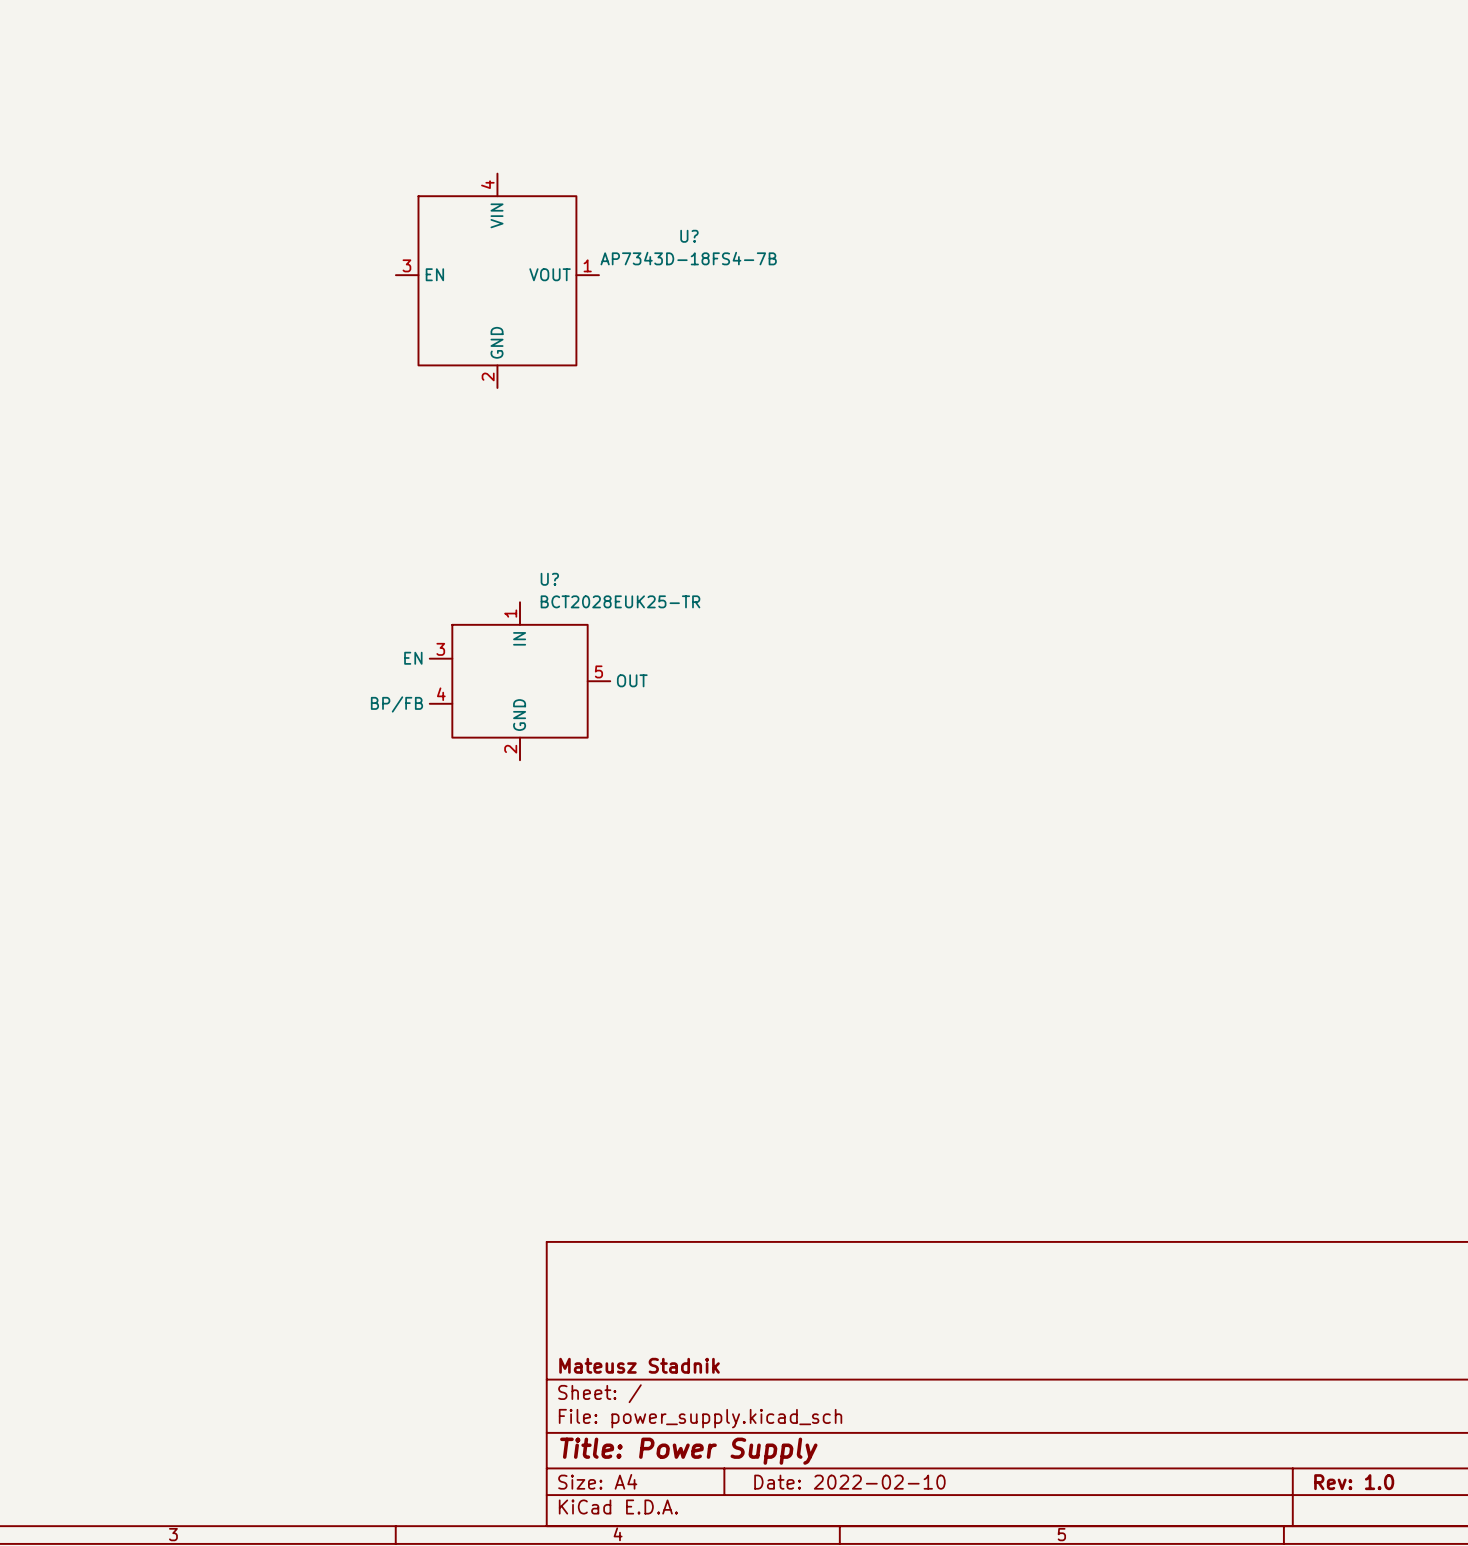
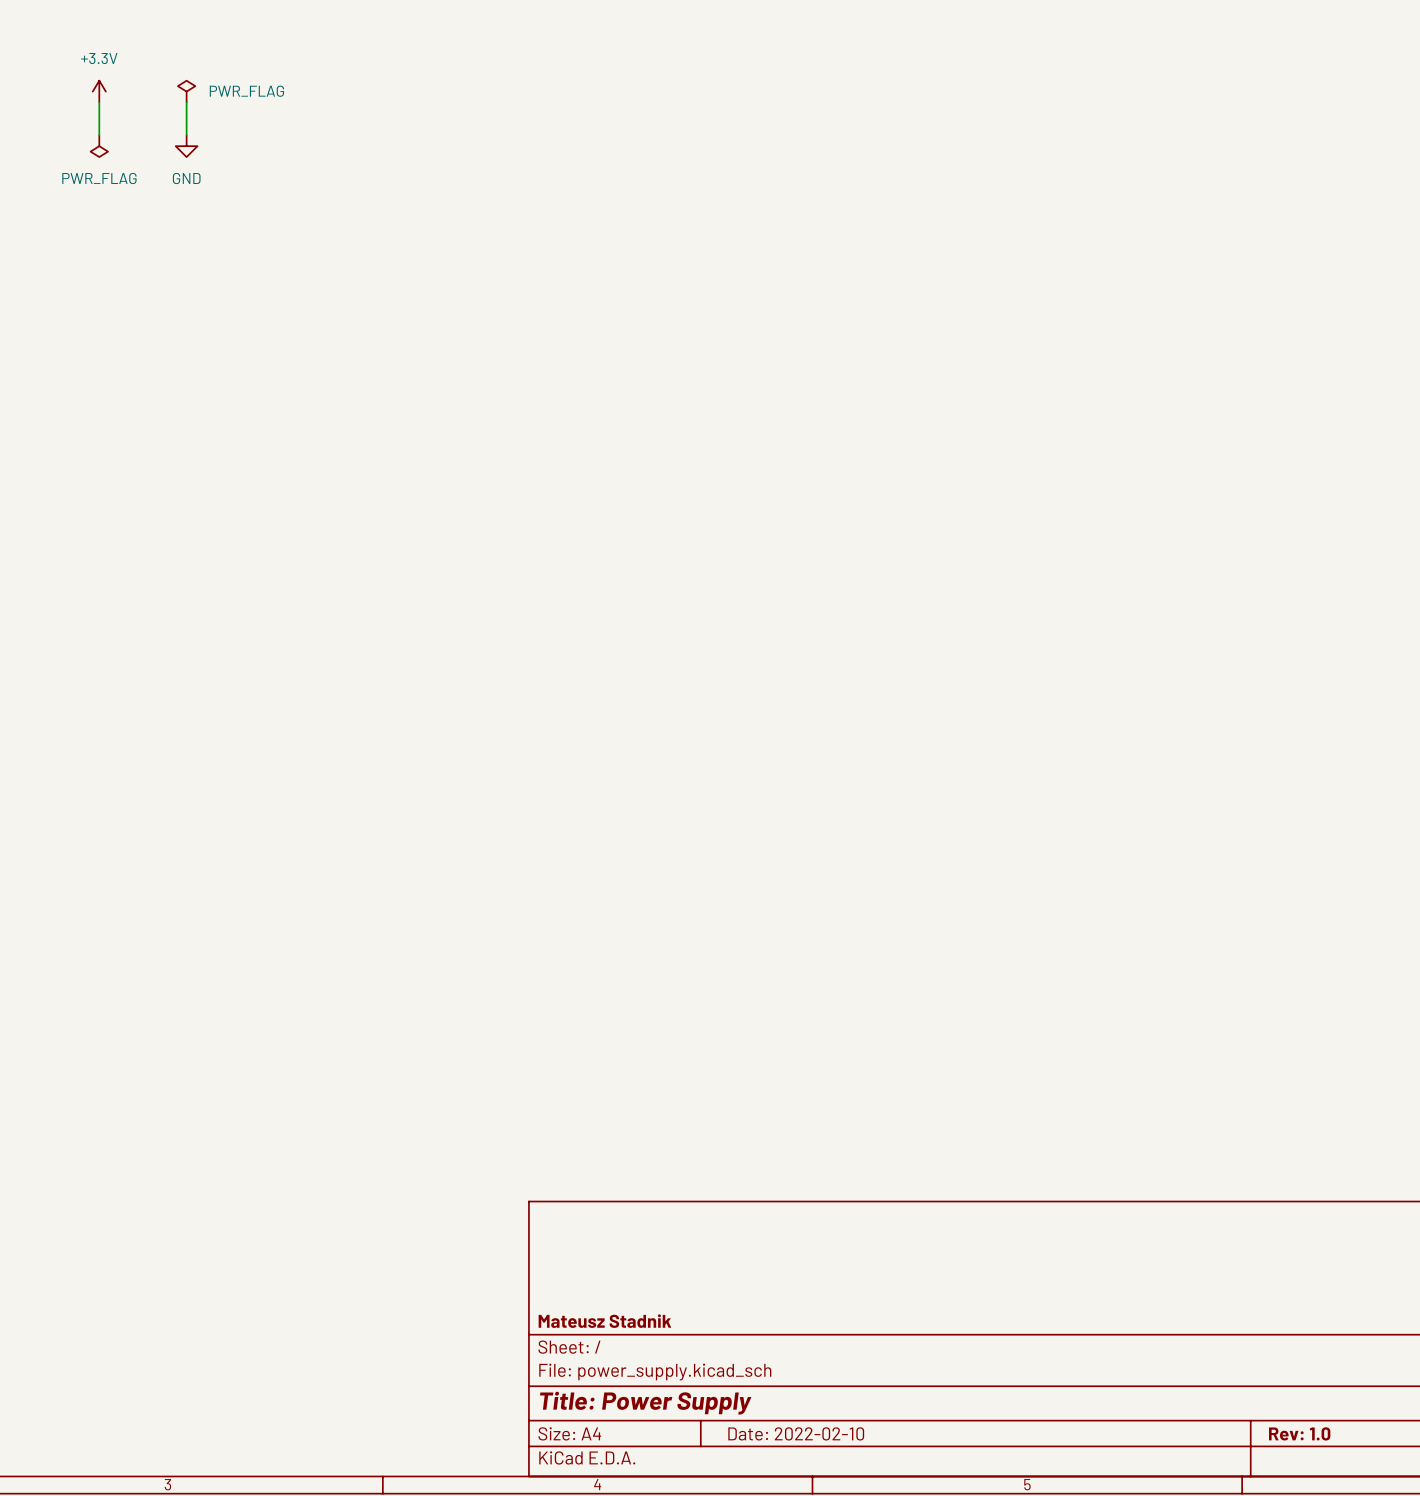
power symbol: none -> +3.3V (99, 91)
power symbol: none -> PWR_FLAG (186, 91)
wire: none -> (99, 102) (99, 135)
wire: none -> (186, 102) (186, 135)
power symbol: none -> PWR_FLAG (99, 146)
power symbol: none -> GND (186, 146)
U?: AP7343D-18FS4-7B (497, 280) -> none
U?: BCT2028EUK25-TR (520, 681) -> none

